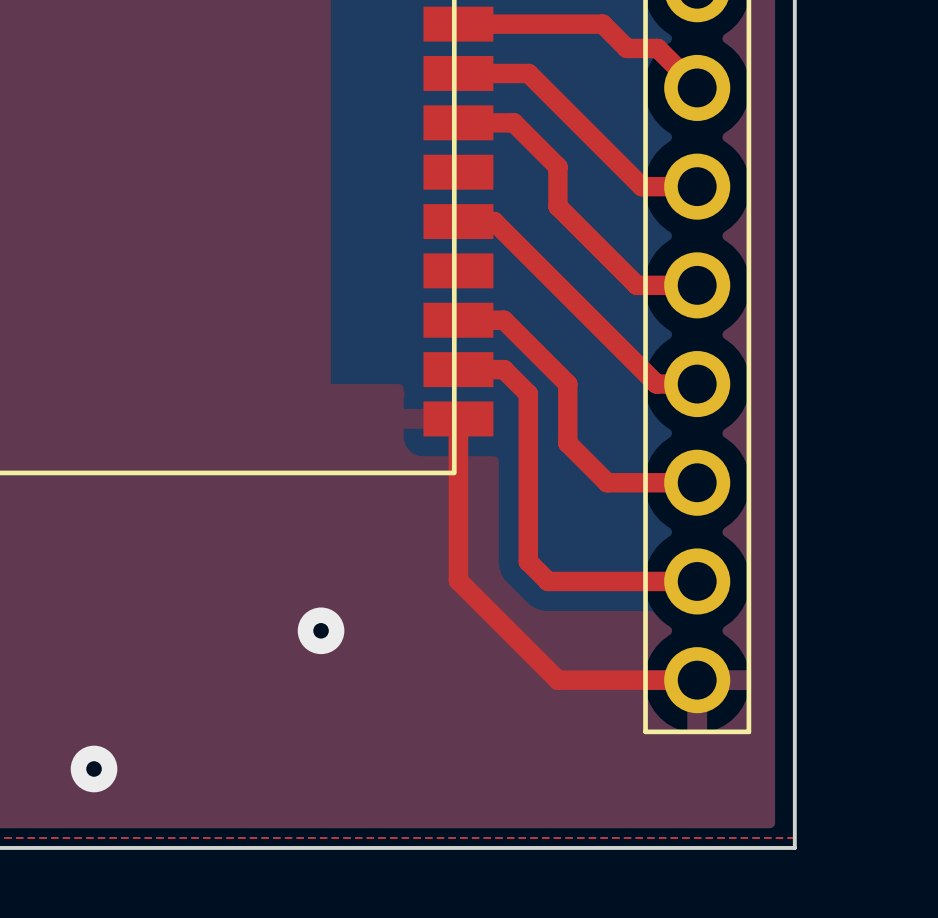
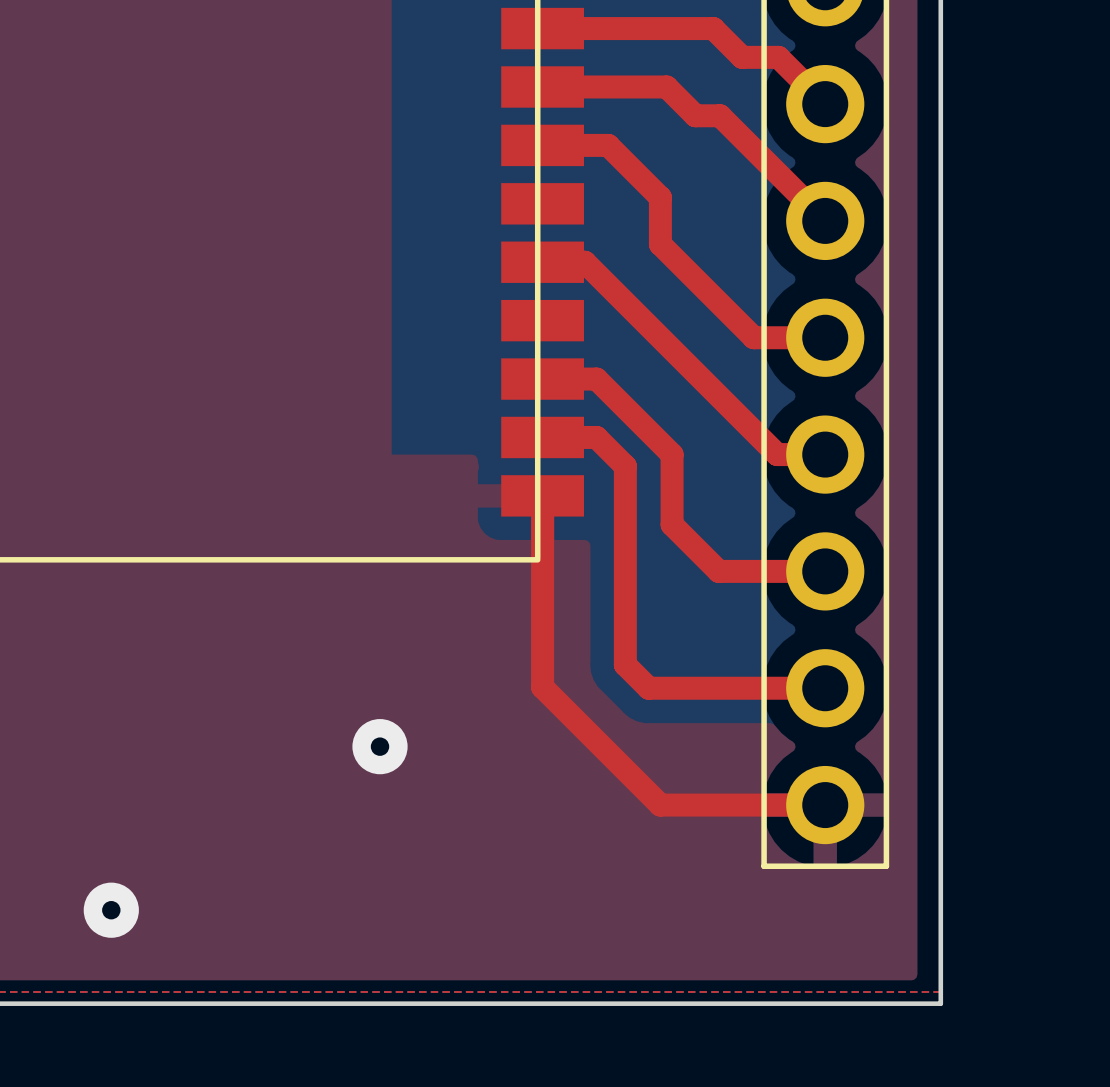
top track: (528, 73) (641, 186) (697, 186) -> (625, 86) (666, 86) (695, 115) (720, 115) (825, 220)

